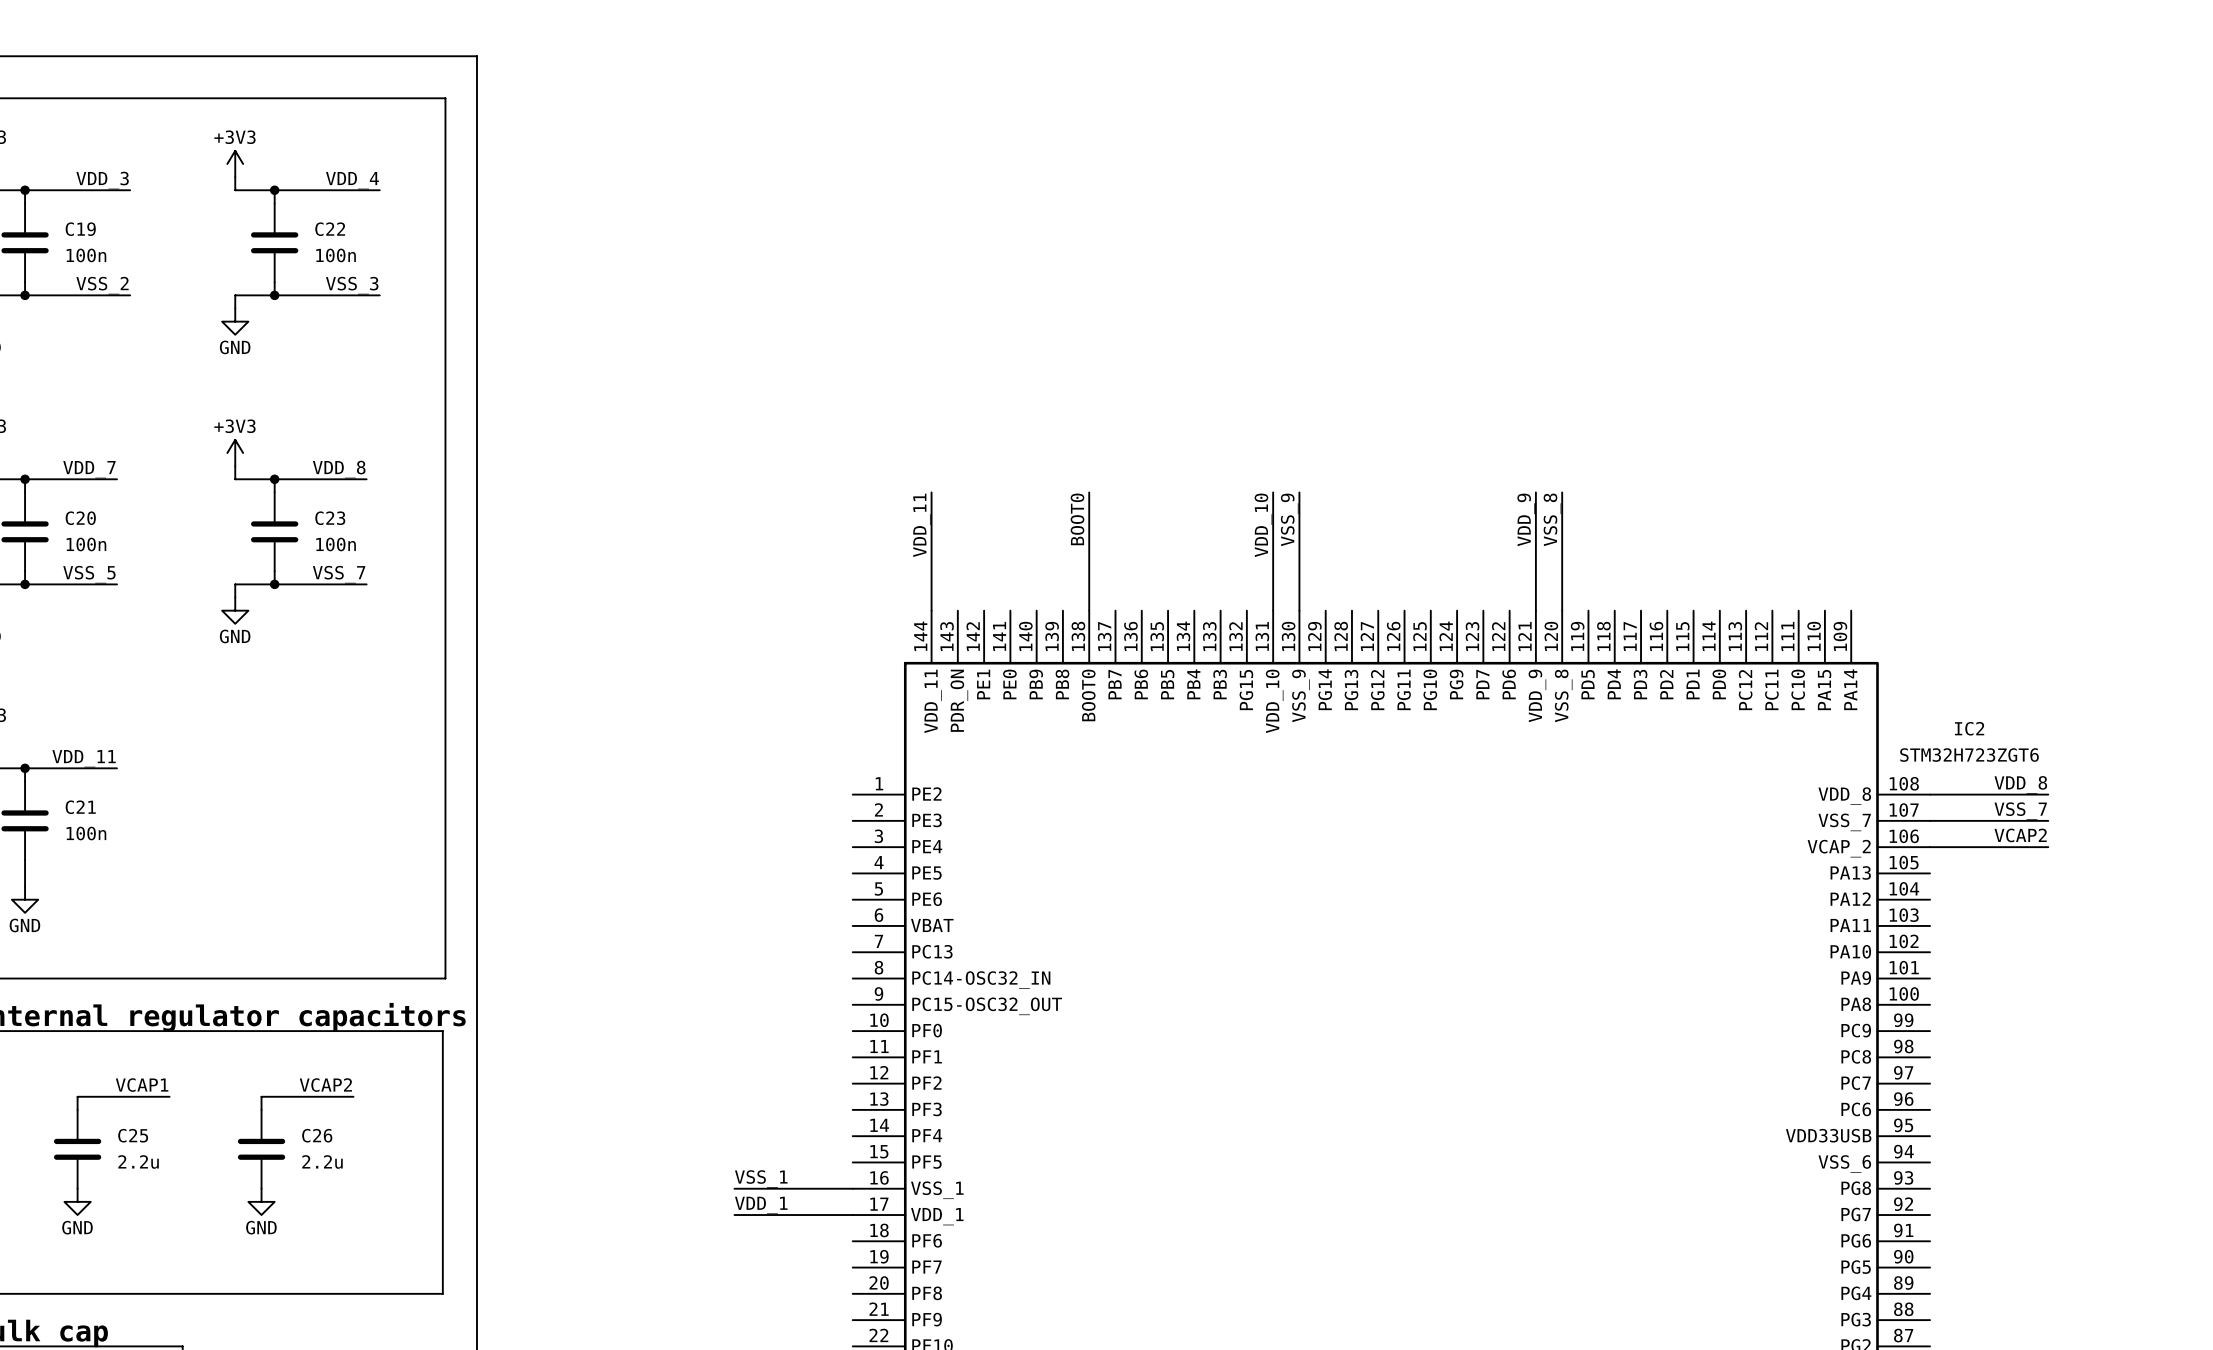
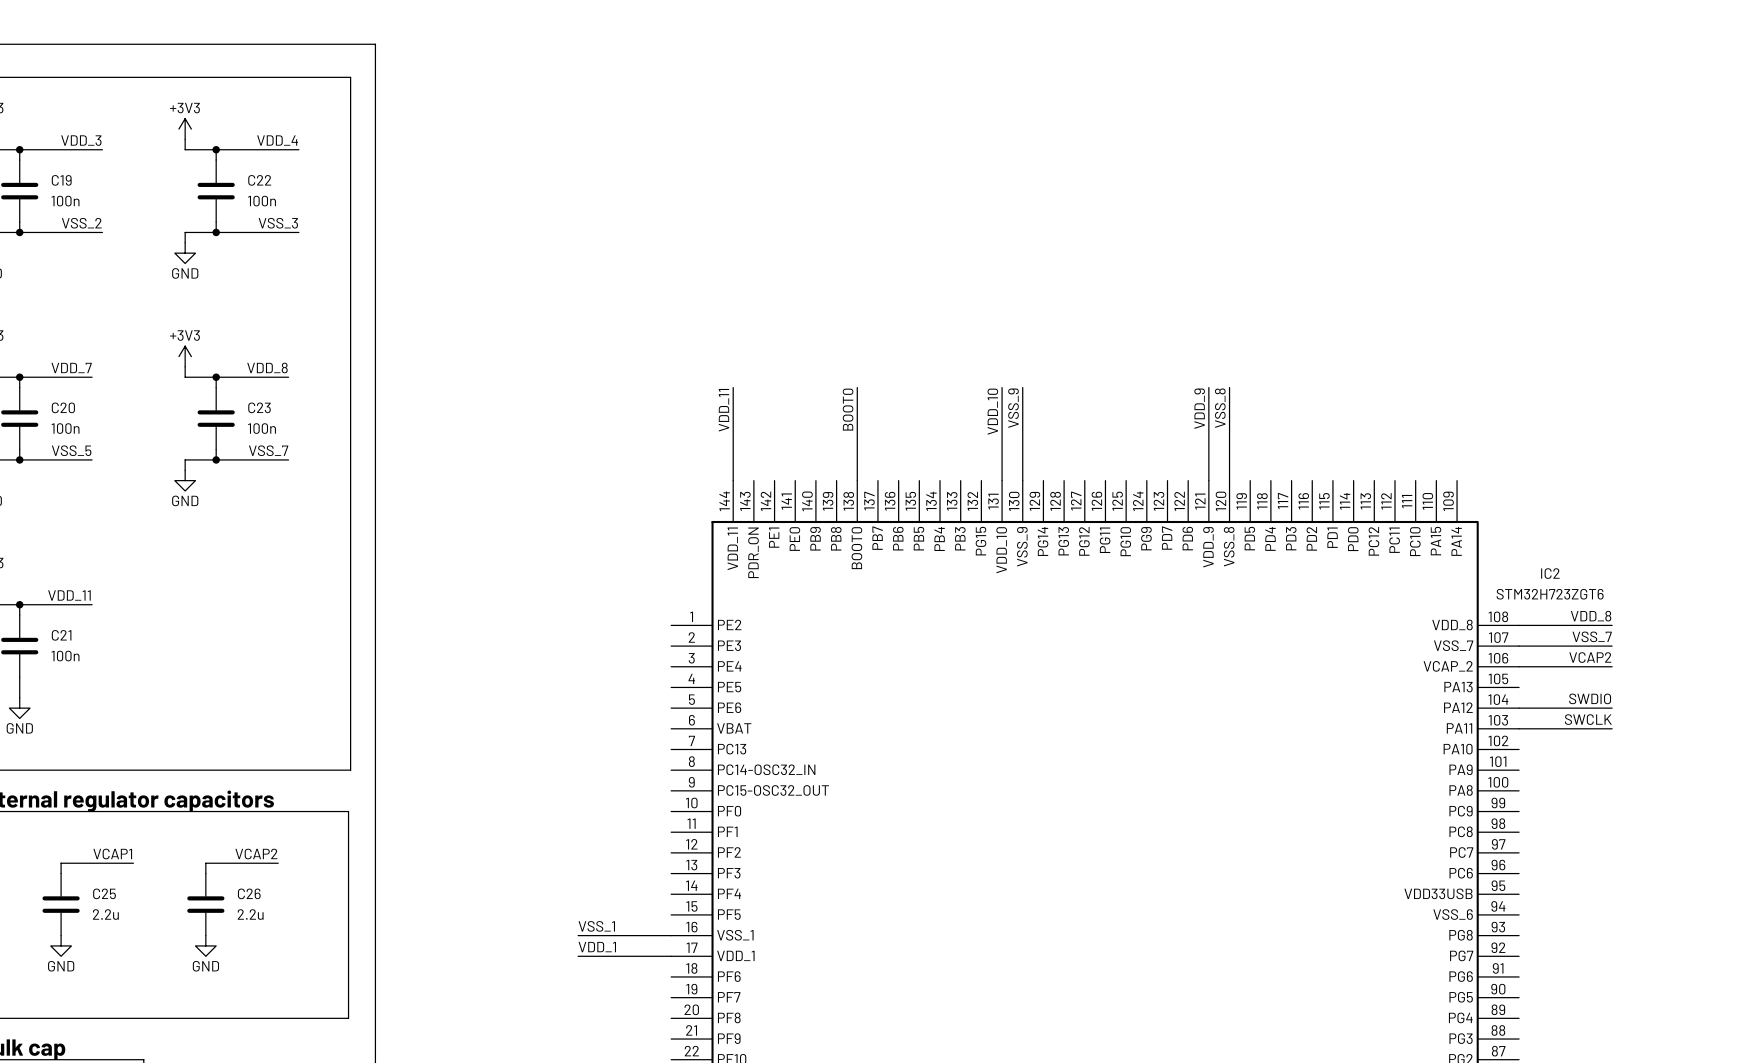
label: none -> SWDIO (1590, 698)
wire: none -> (1519, 708) (1612, 708)
label: none -> SWCLK (1588, 719)
wire: none -> (1519, 728) (1612, 728)

